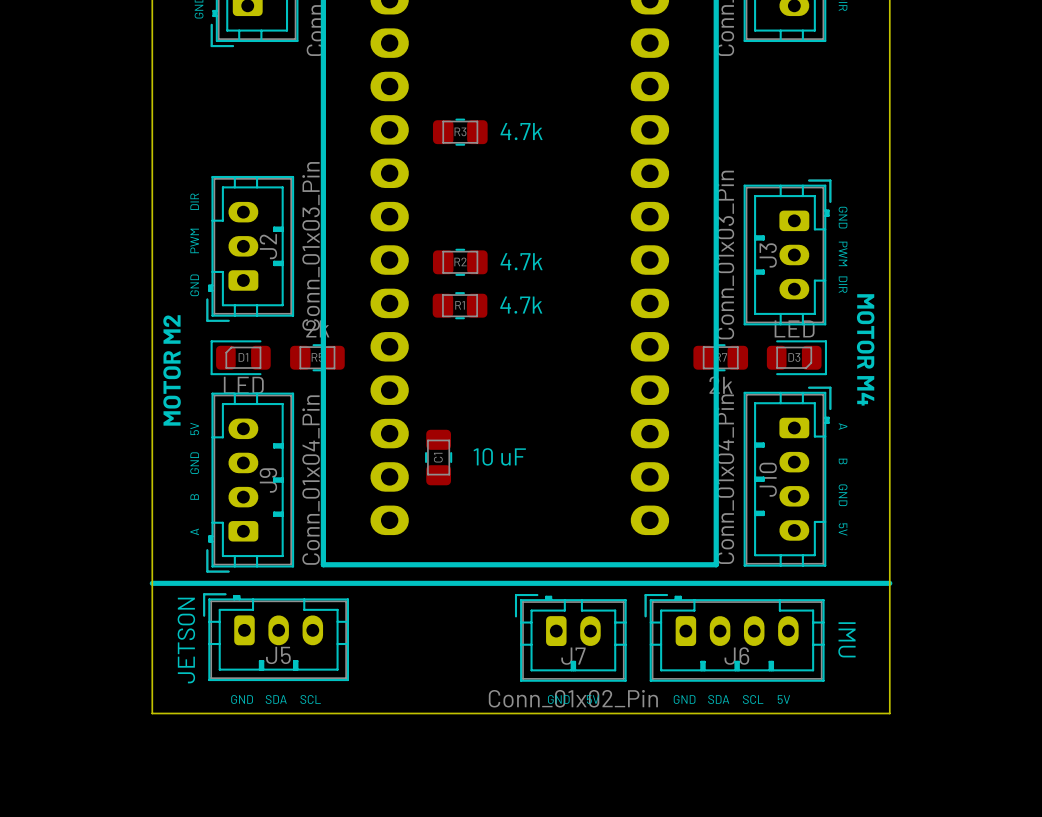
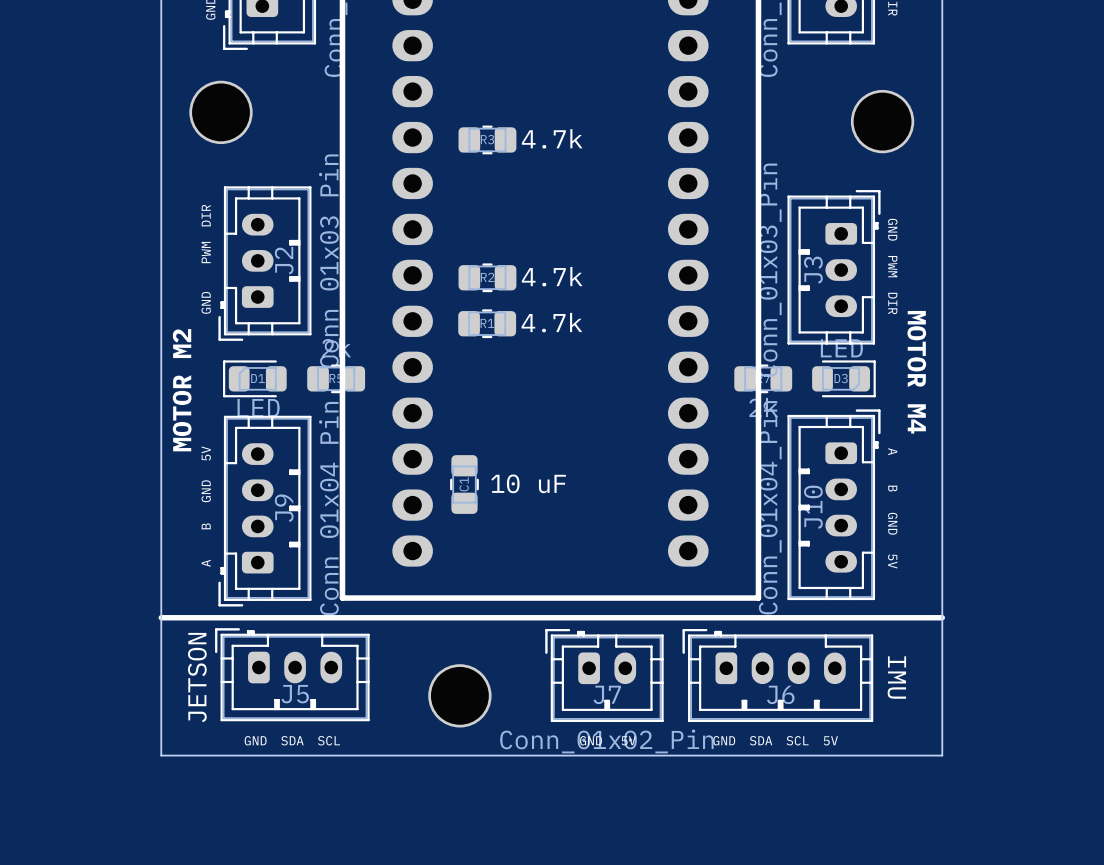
part: none -> (221, 112)
part: none -> (882, 121)
part: none -> (459, 695)

